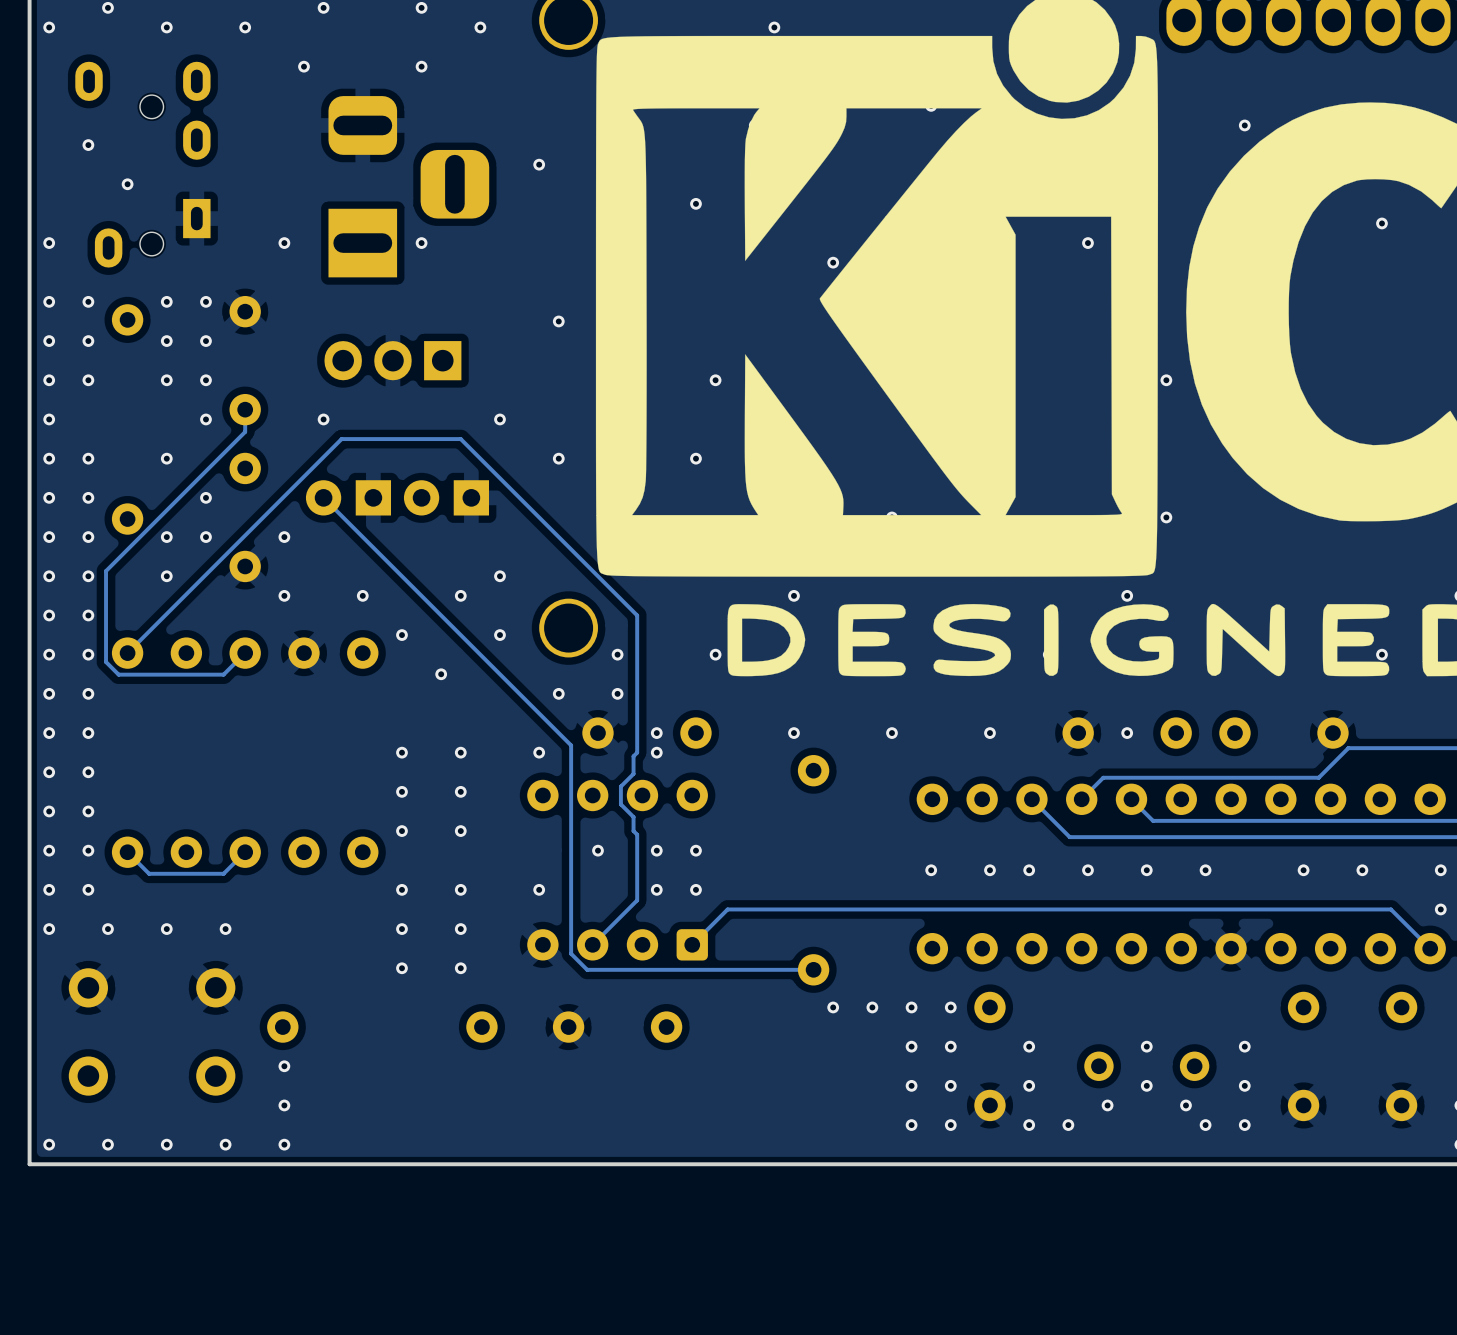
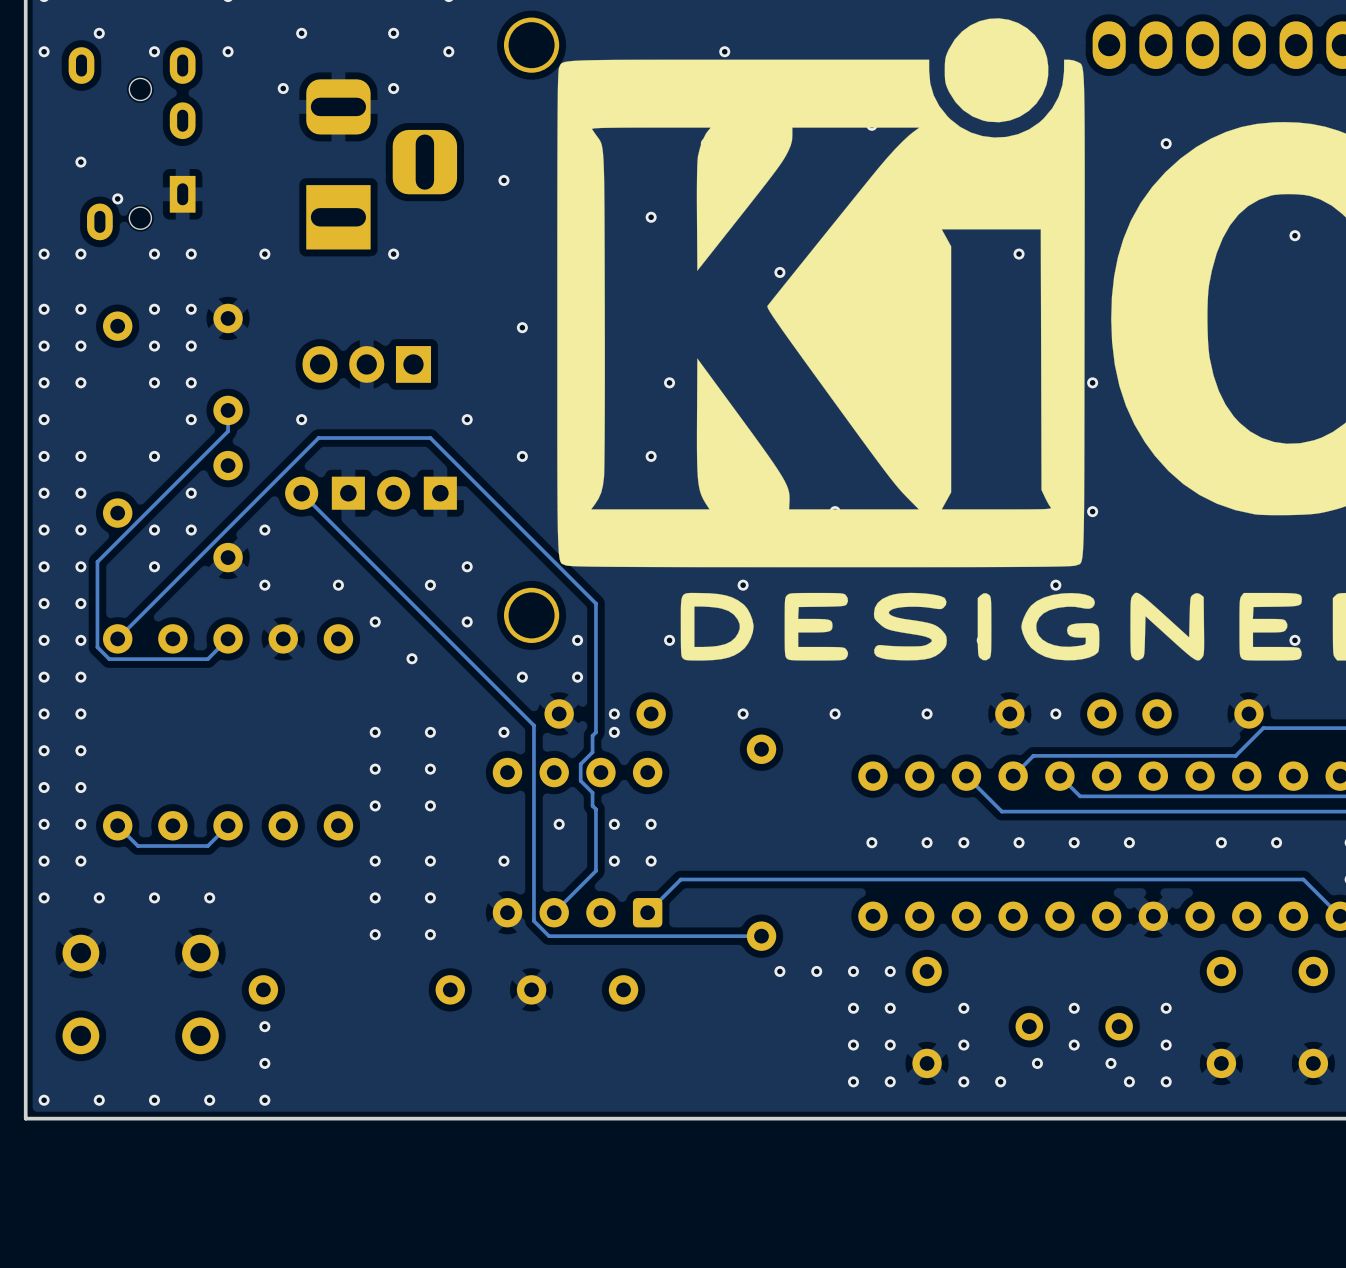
part position: (142, 164) -> (132, 143)
part position: (408, 186) -> (381, 164)
via: none -> (80, 254)
via: none -> (154, 254)
via: none -> (191, 254)

